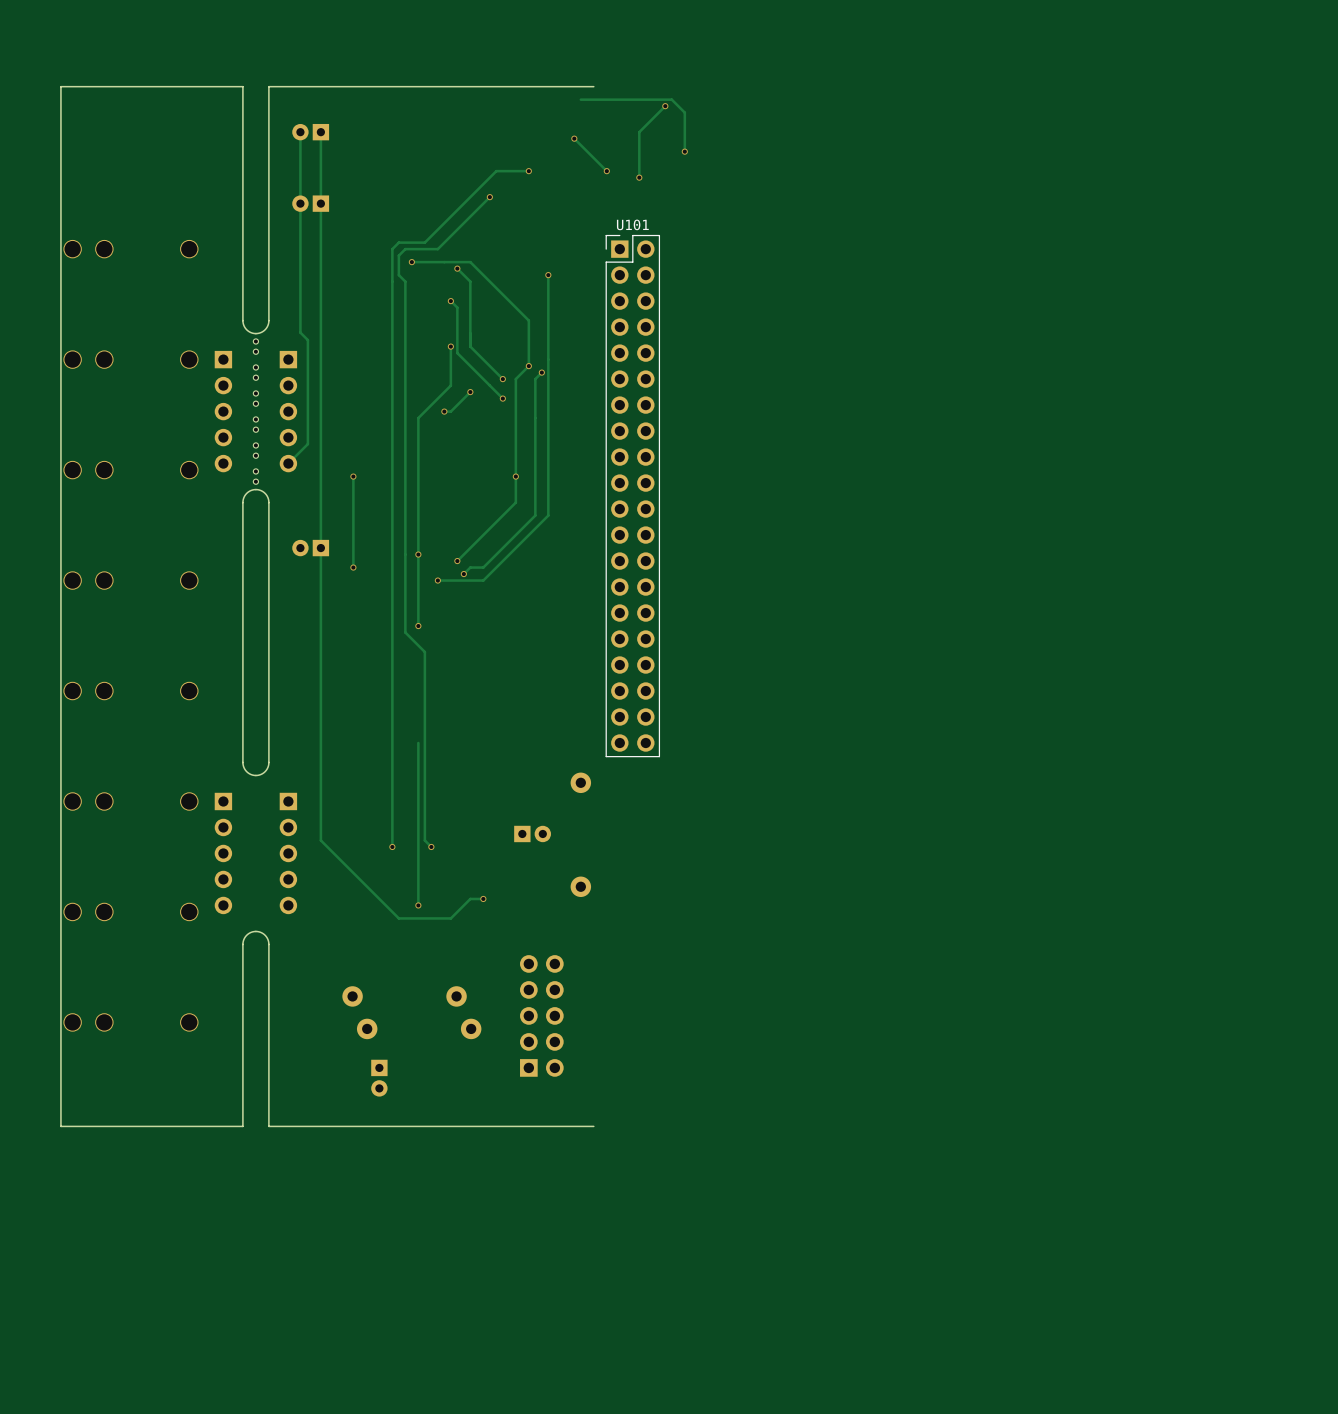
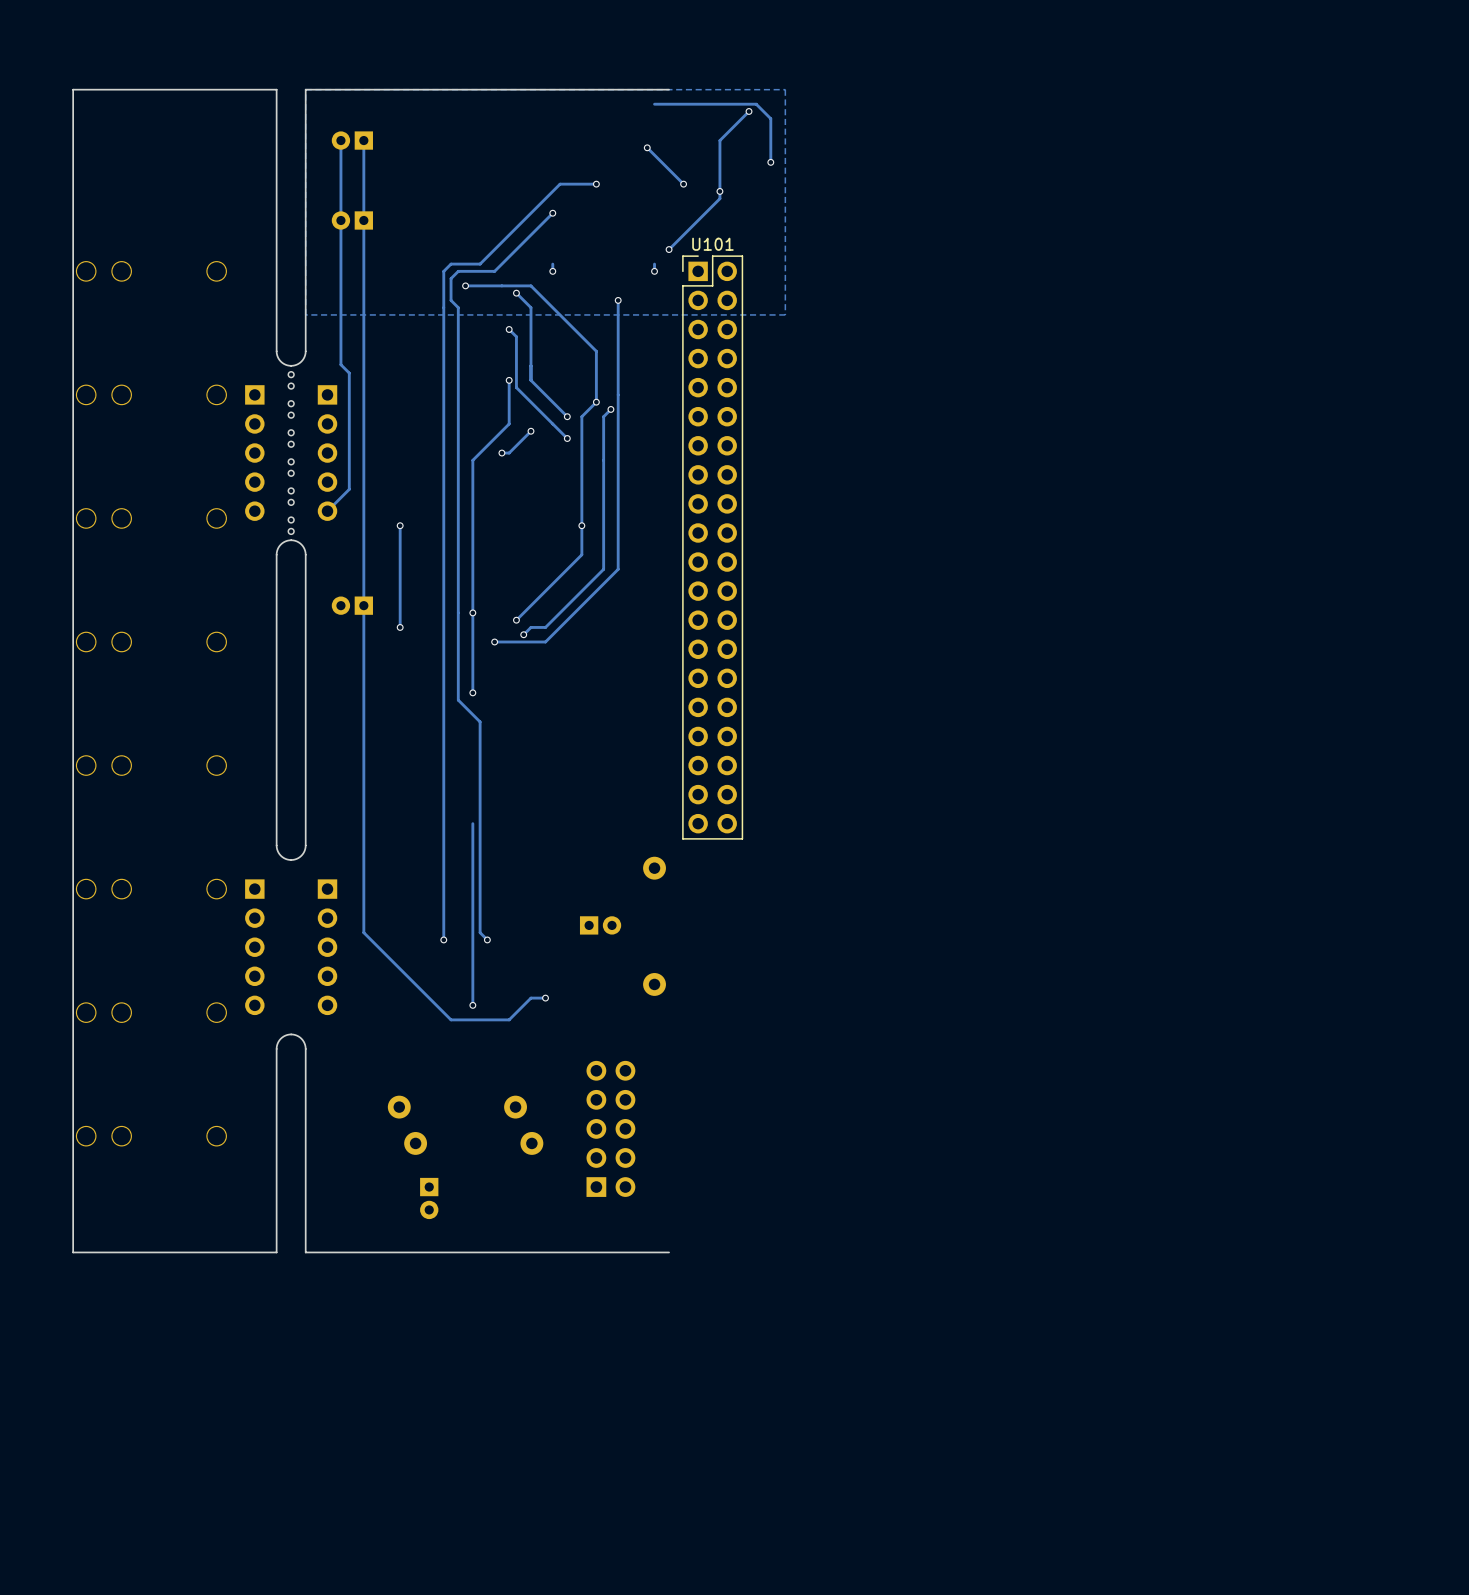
zone outline: none -> (785, 89) (305, 89) (305, 314) (785, 314) (785, 89)
track: none -> (719, 191) (719, 198) (669, 249)
via: none -> (669, 249)
track: none -> (552, 264) (552, 271)
track: none -> (654, 264) (654, 271)
via: none -> (552, 271)
via: none -> (654, 271)

